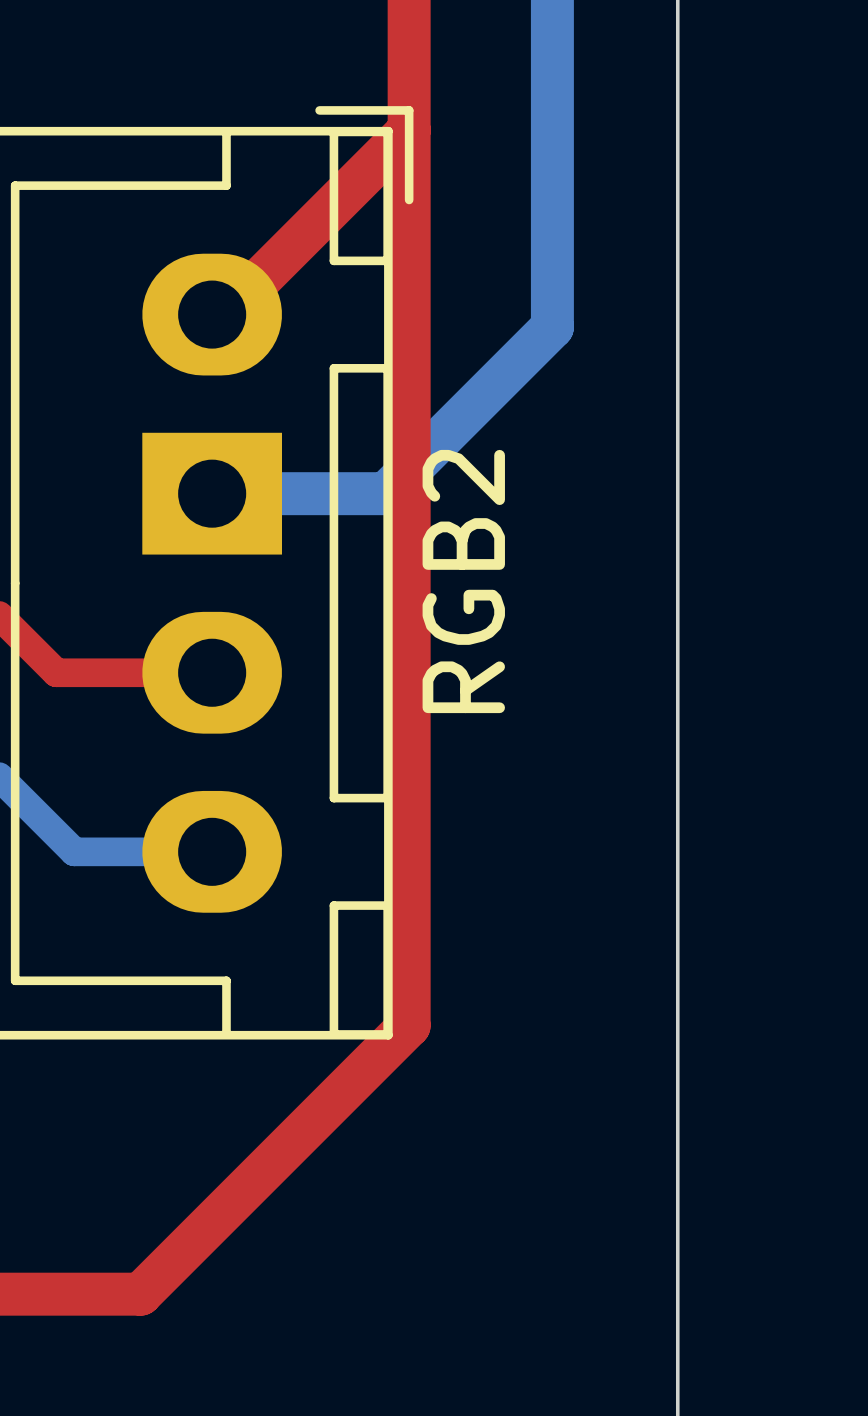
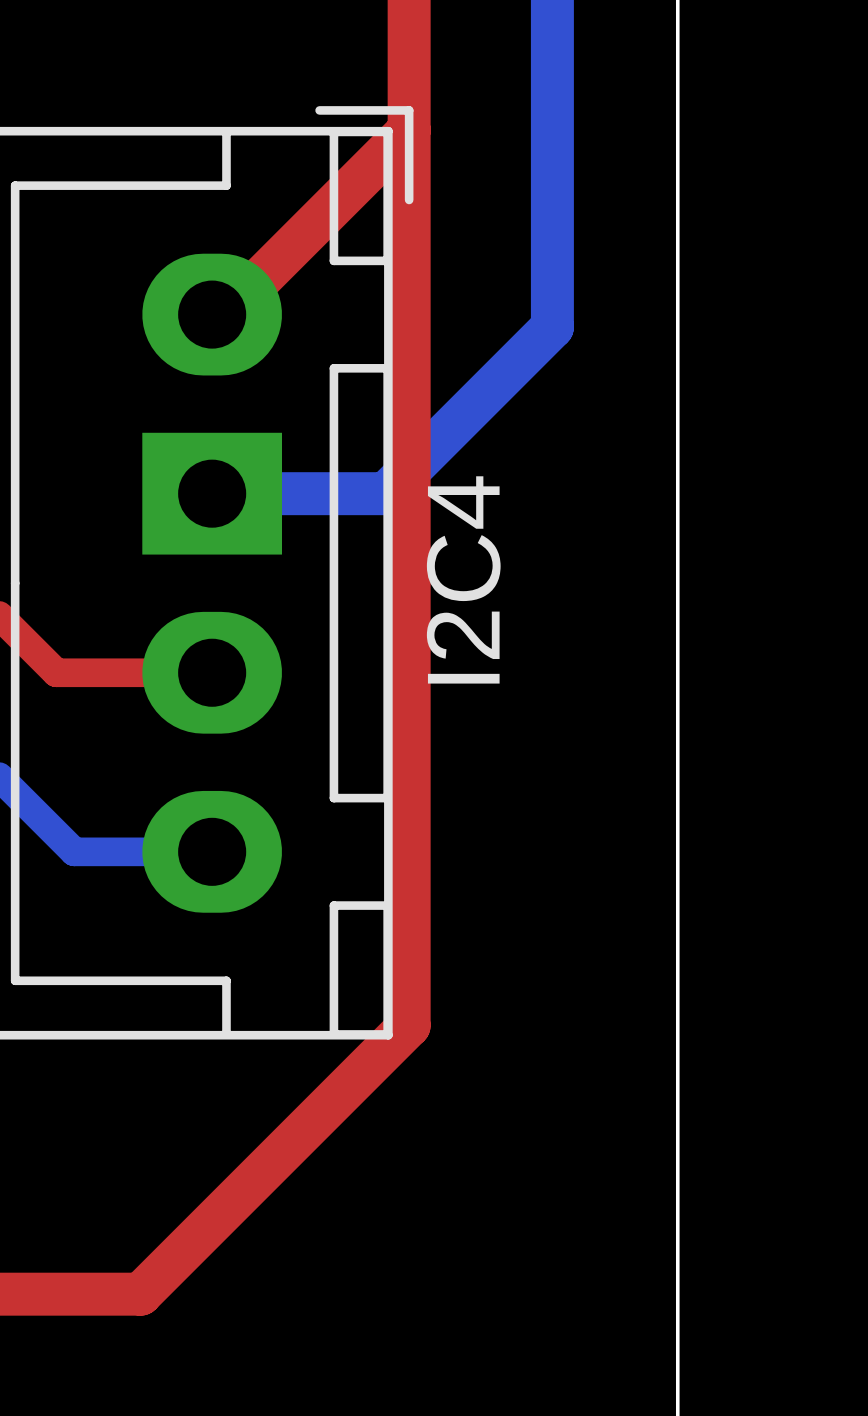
RGB2 name: RGB2 (463, 581) -> I2C4 (463, 579)

